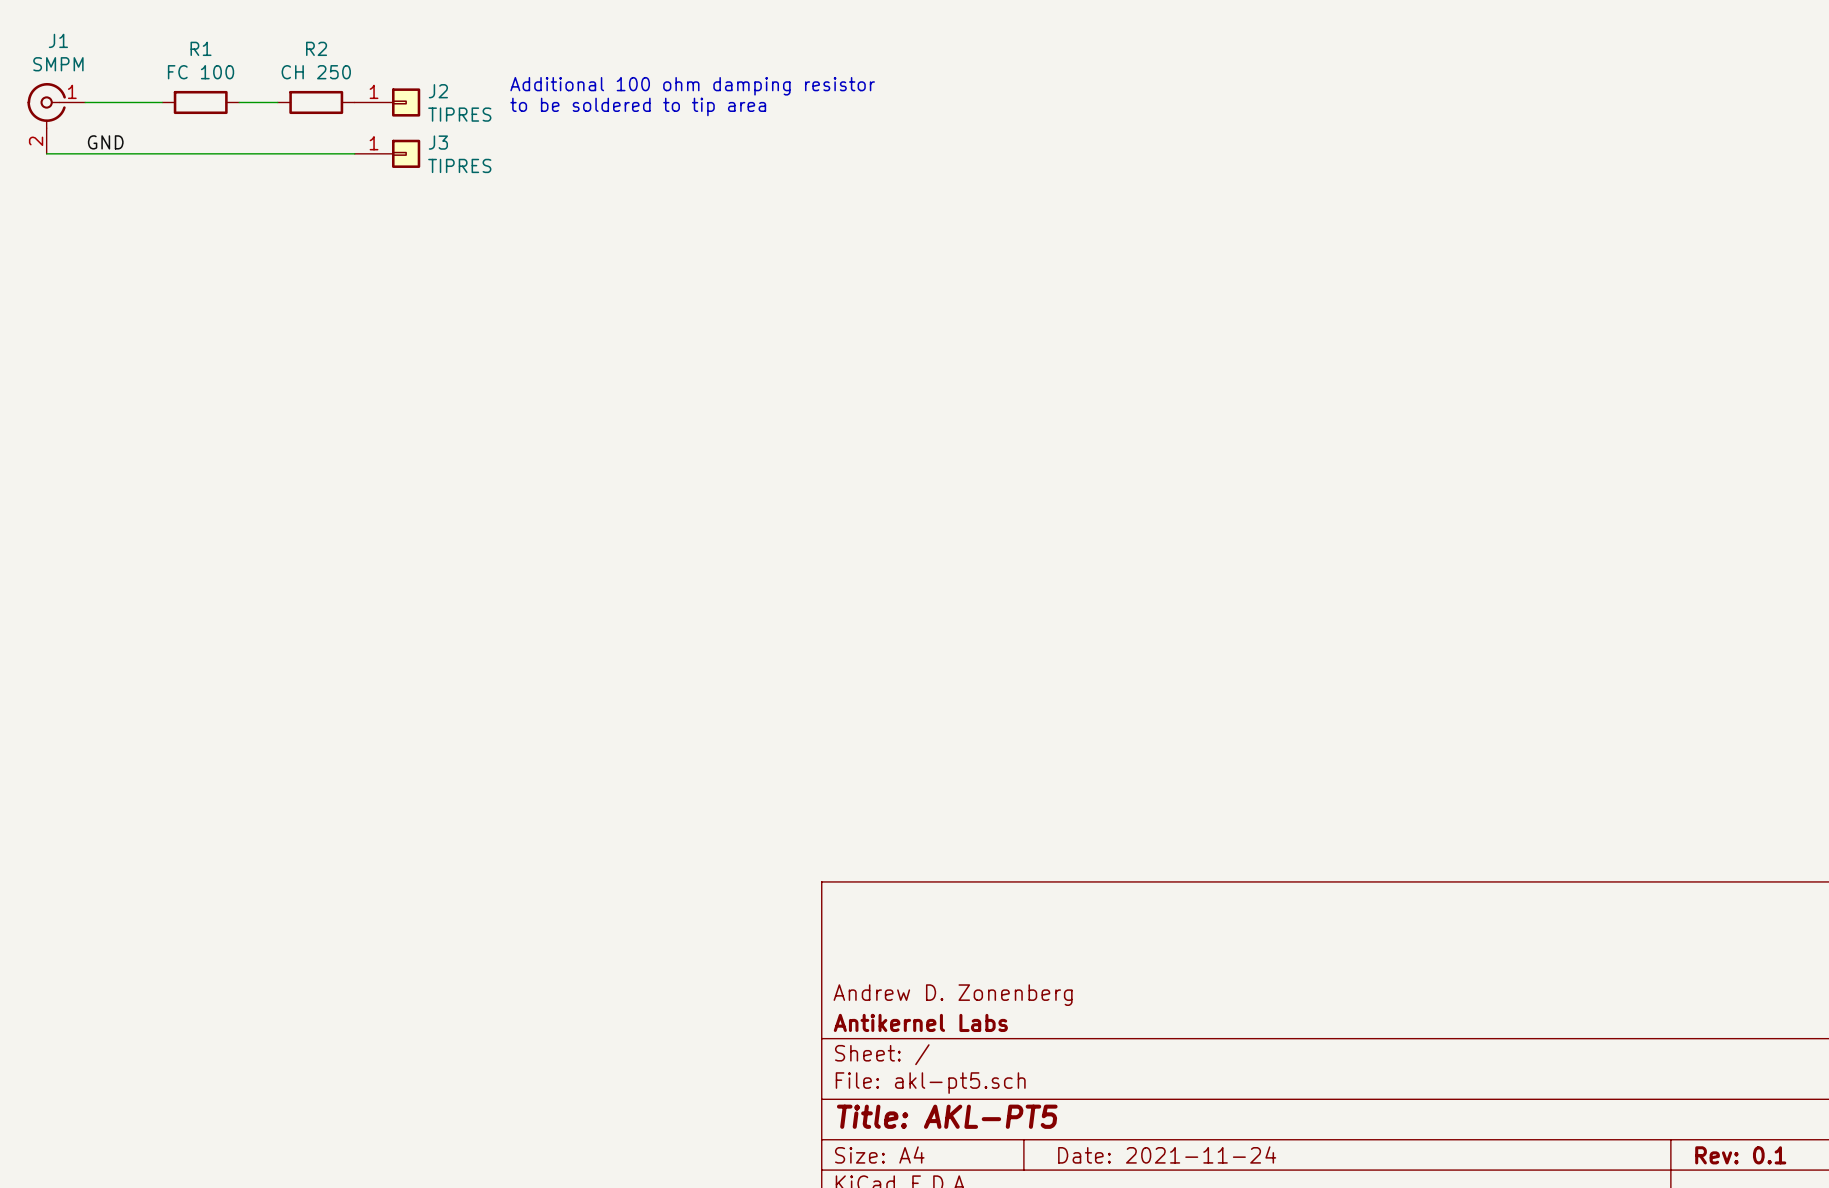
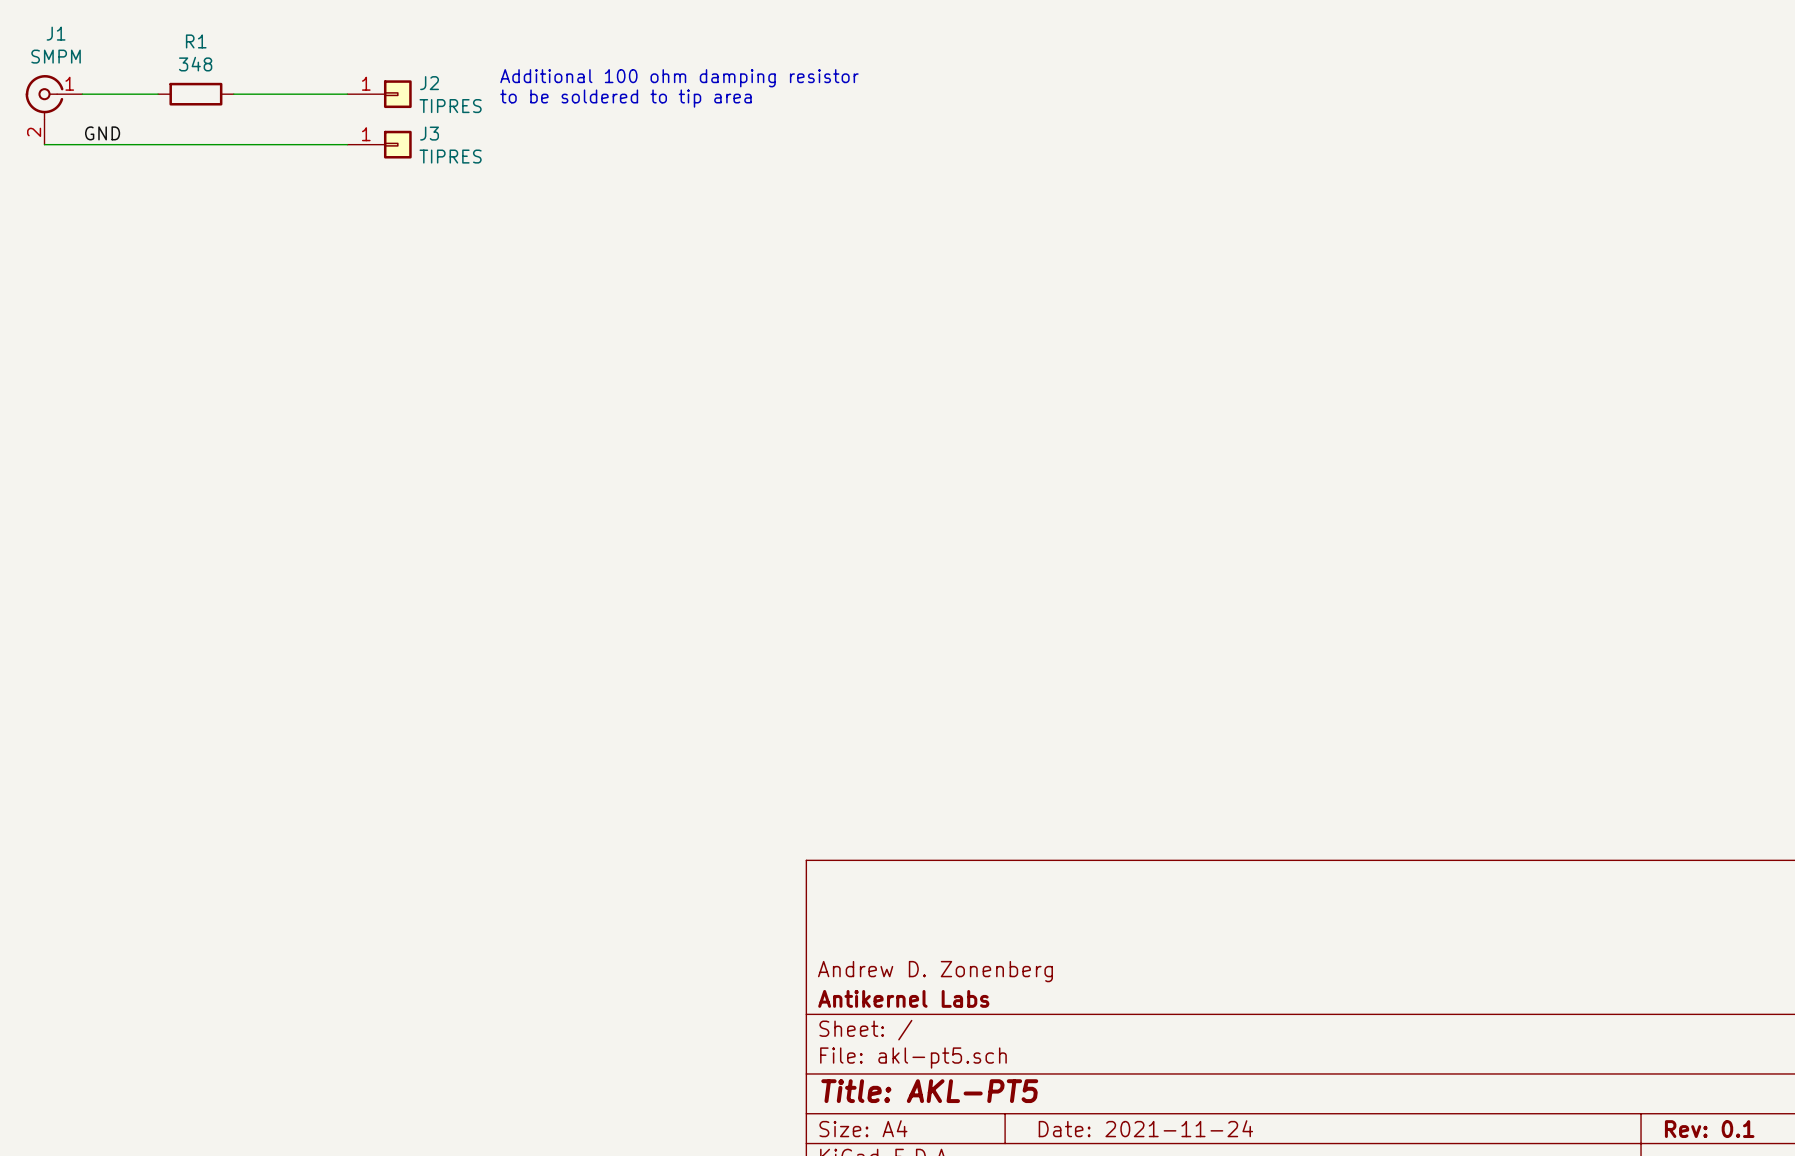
R1 value: FC 100 (201, 72) -> 348 (195, 64)
wire: none -> (271, 94) (347, 94)
R2: CH 250 (316, 102) -> none

